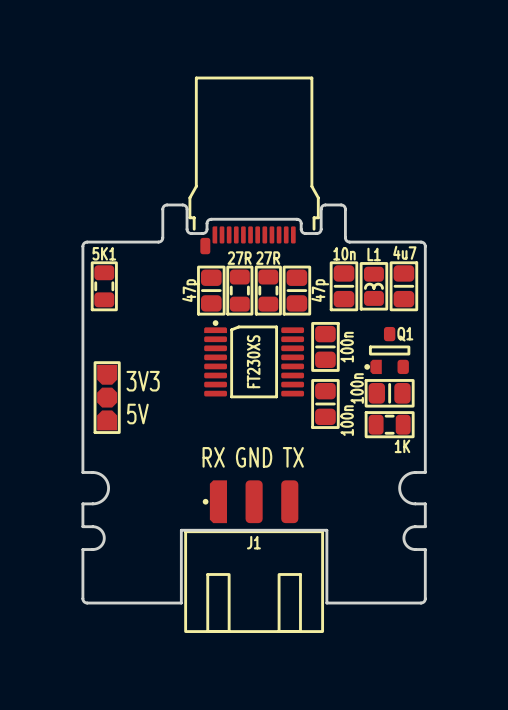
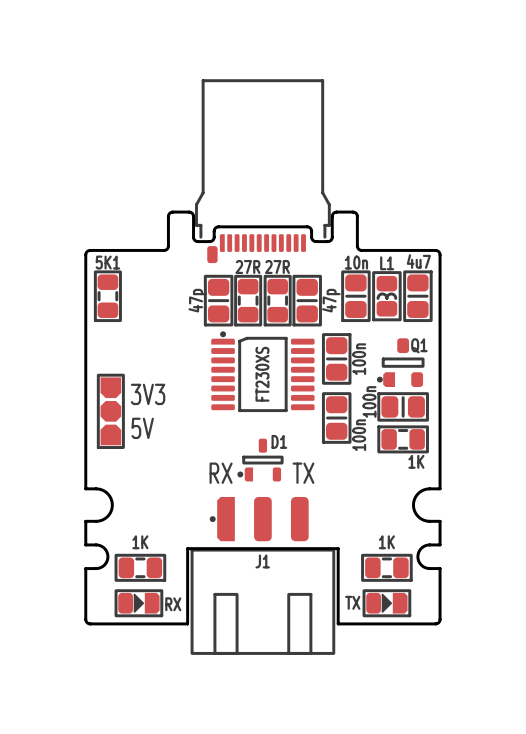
D1: none -> (260, 460)
text: GND (254, 457) -> none
part: none -> 1K (140, 567)
part: none -> 1K (386, 567)
part: none -> RX (138, 603)
part: none -> TX (386, 603)

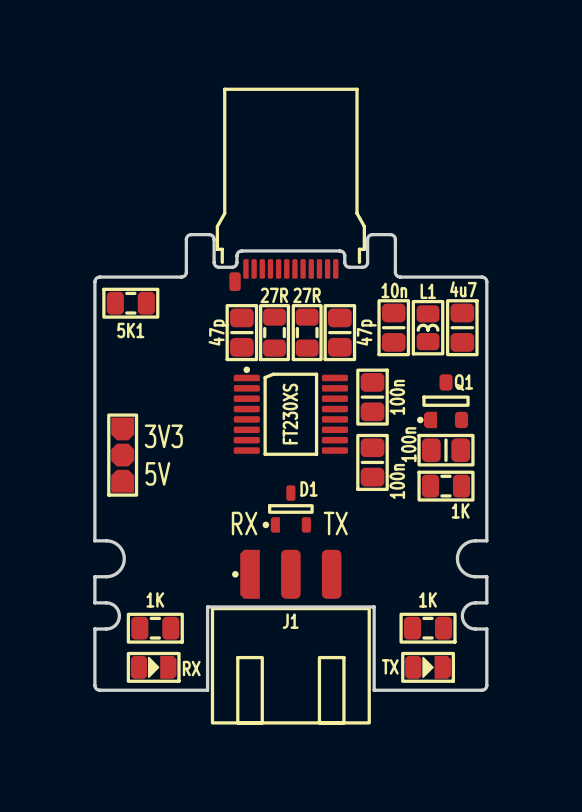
part value position: 5K1 (107, 262) -> 5K1 (130, 330)
part rotation: 0° (107, 296) -> 90° clockwise (130, 303)

